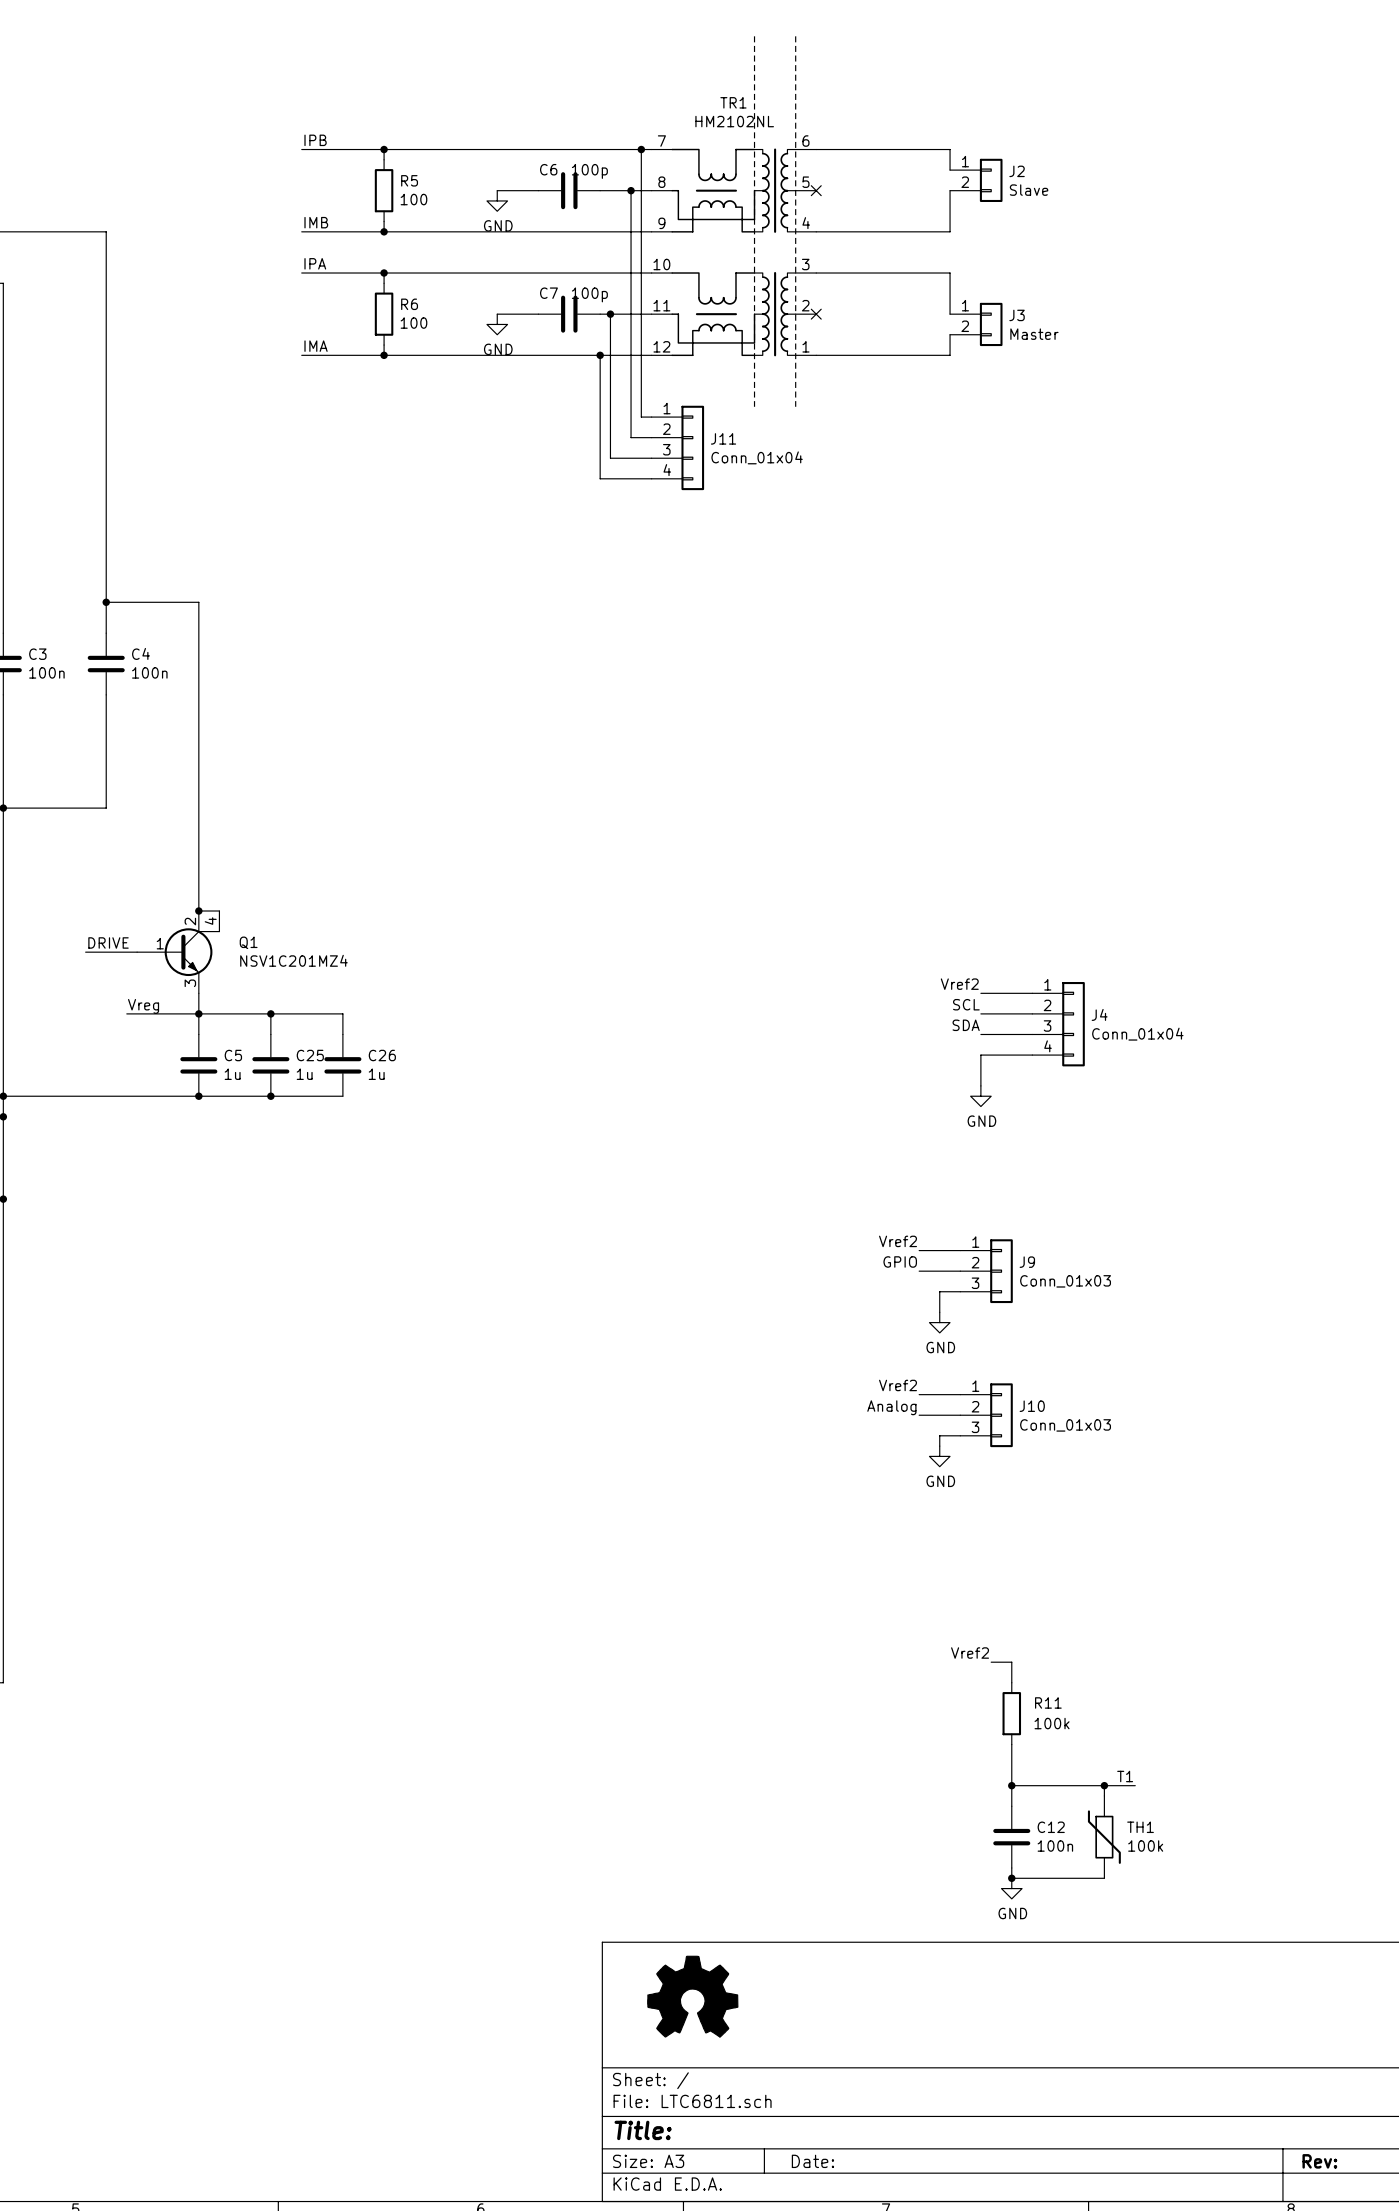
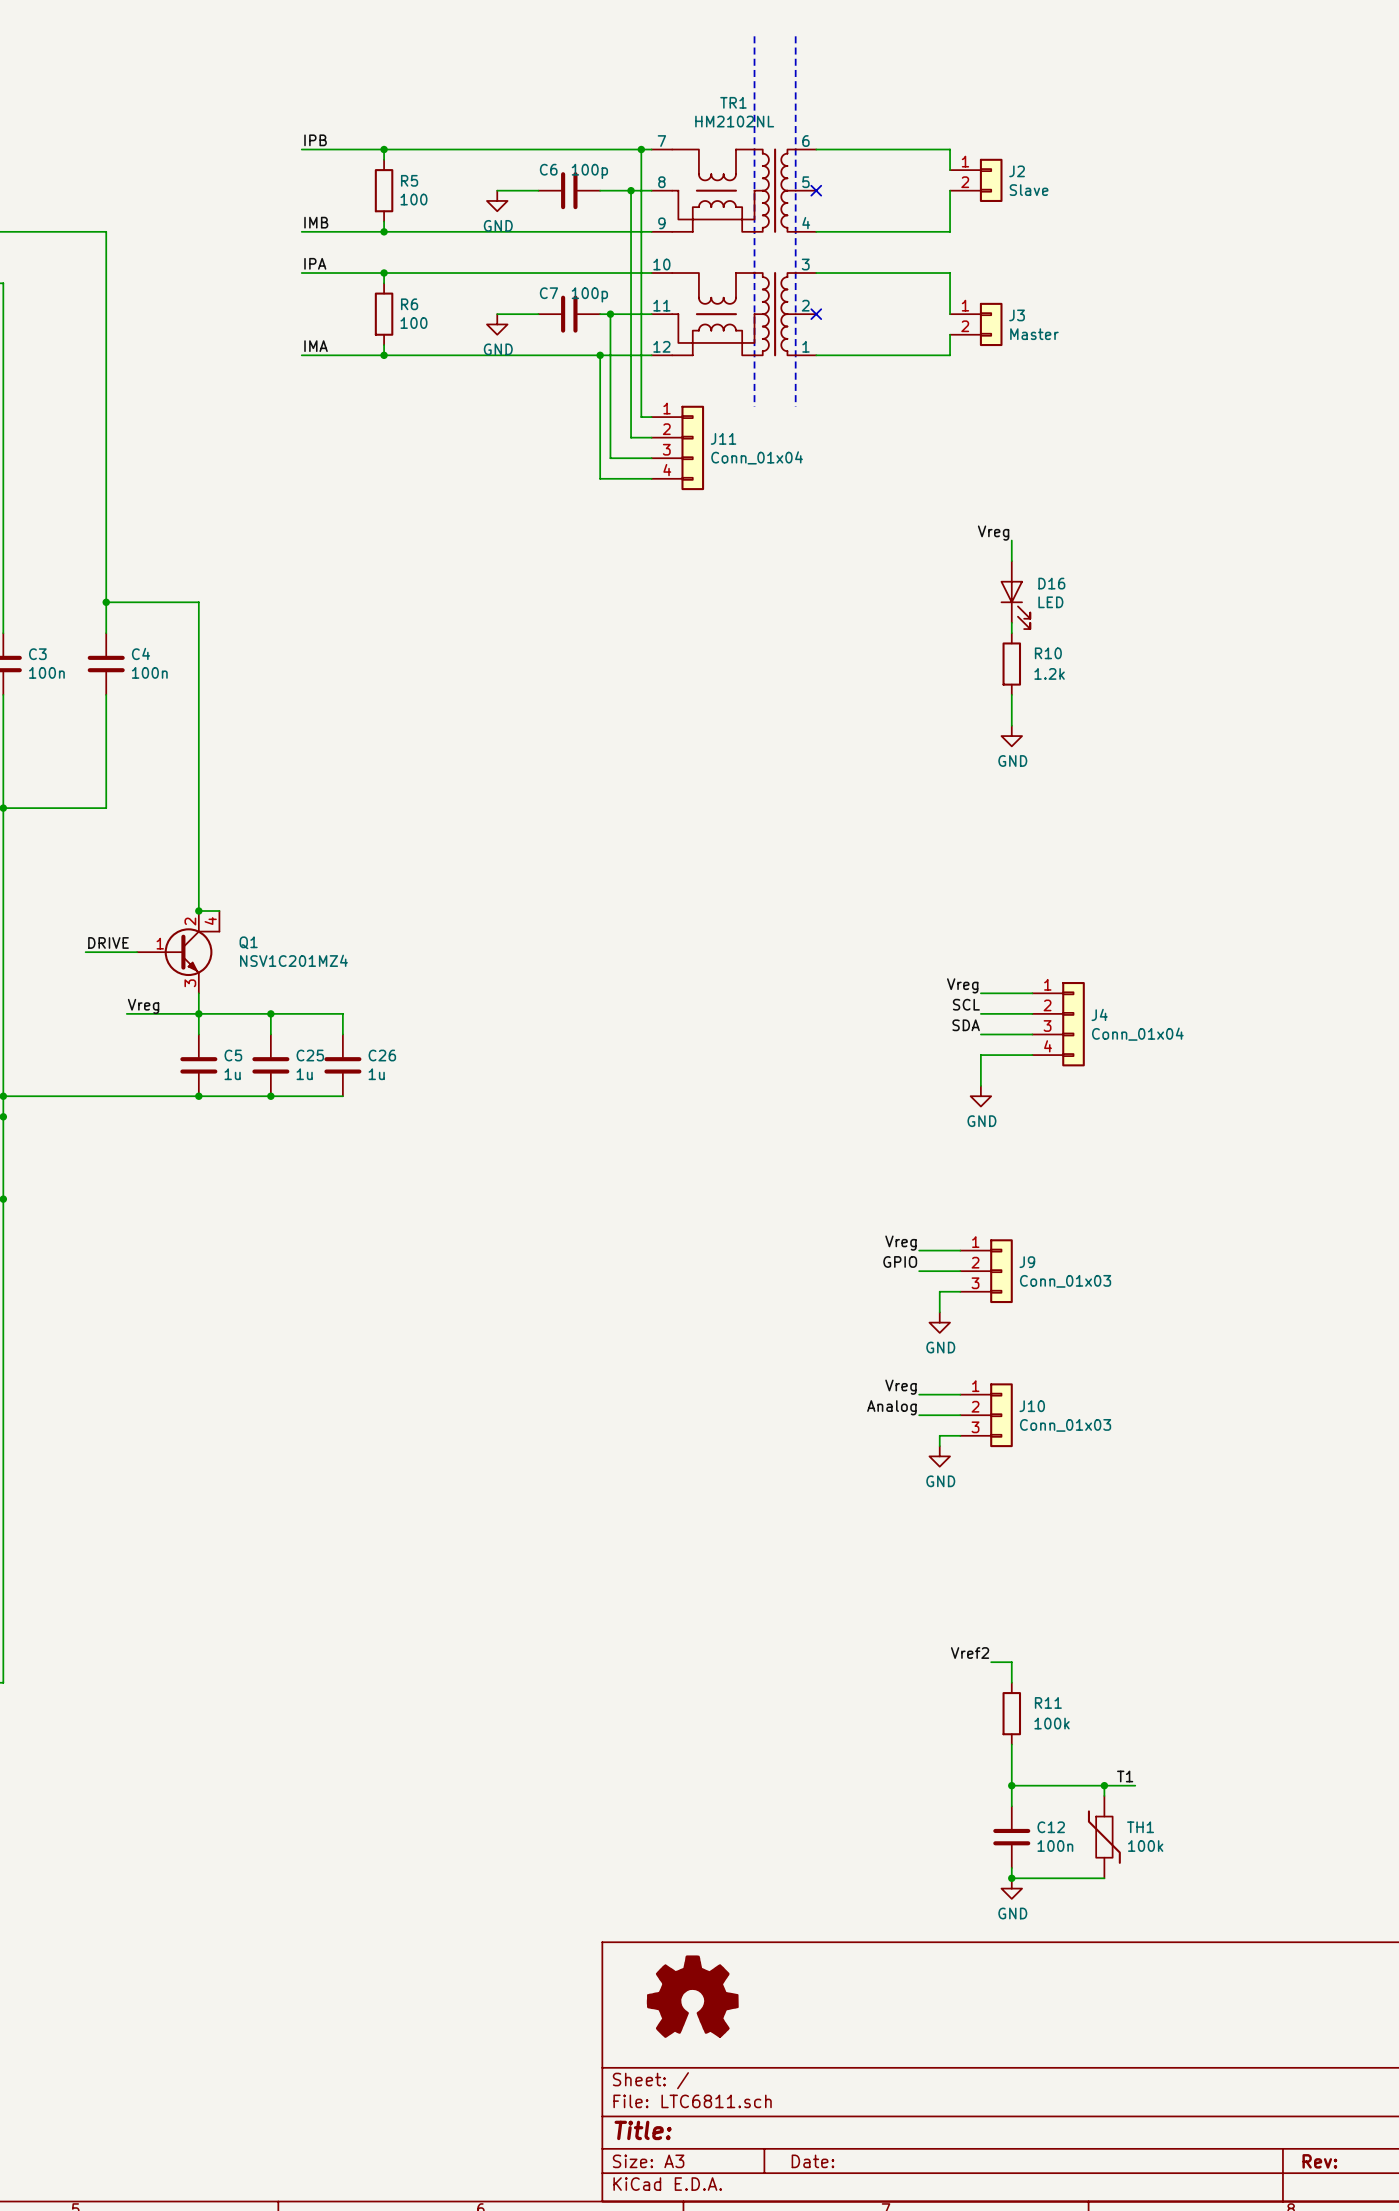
label: none -> Vreg (993, 533)
wire: none -> (1011, 540) (1011, 561)
D16: none -> LED (1015, 595)
wire: none -> (1011, 622) (1011, 633)
R10: none -> 1.2k (1011, 664)
wire: none -> (1011, 694) (1011, 725)
power symbol: none -> GND (1011, 736)
label: Vref2 (959, 984) -> Vreg (962, 985)
label: Vref2 (898, 1241) -> Vreg (900, 1243)
label: Vref2 (898, 1385) -> Vreg (900, 1387)

